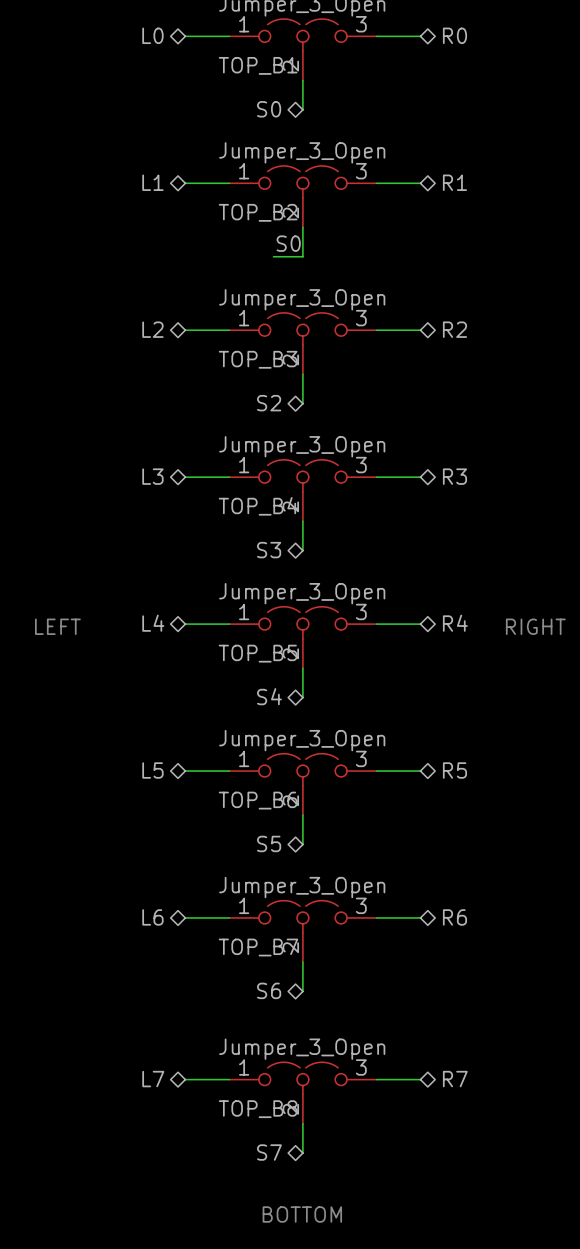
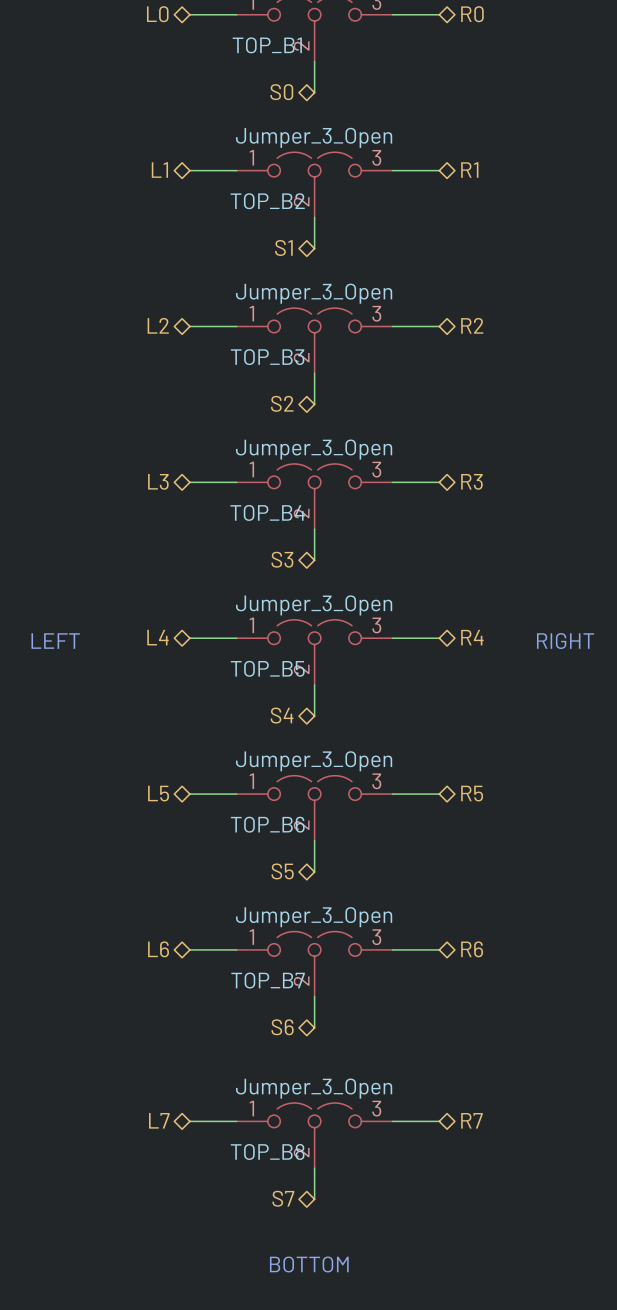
label: S0 (288, 243) -> none
hierarchical label: none -> S1 (283, 247)
wire: (273, 256) (302, 256) -> none

